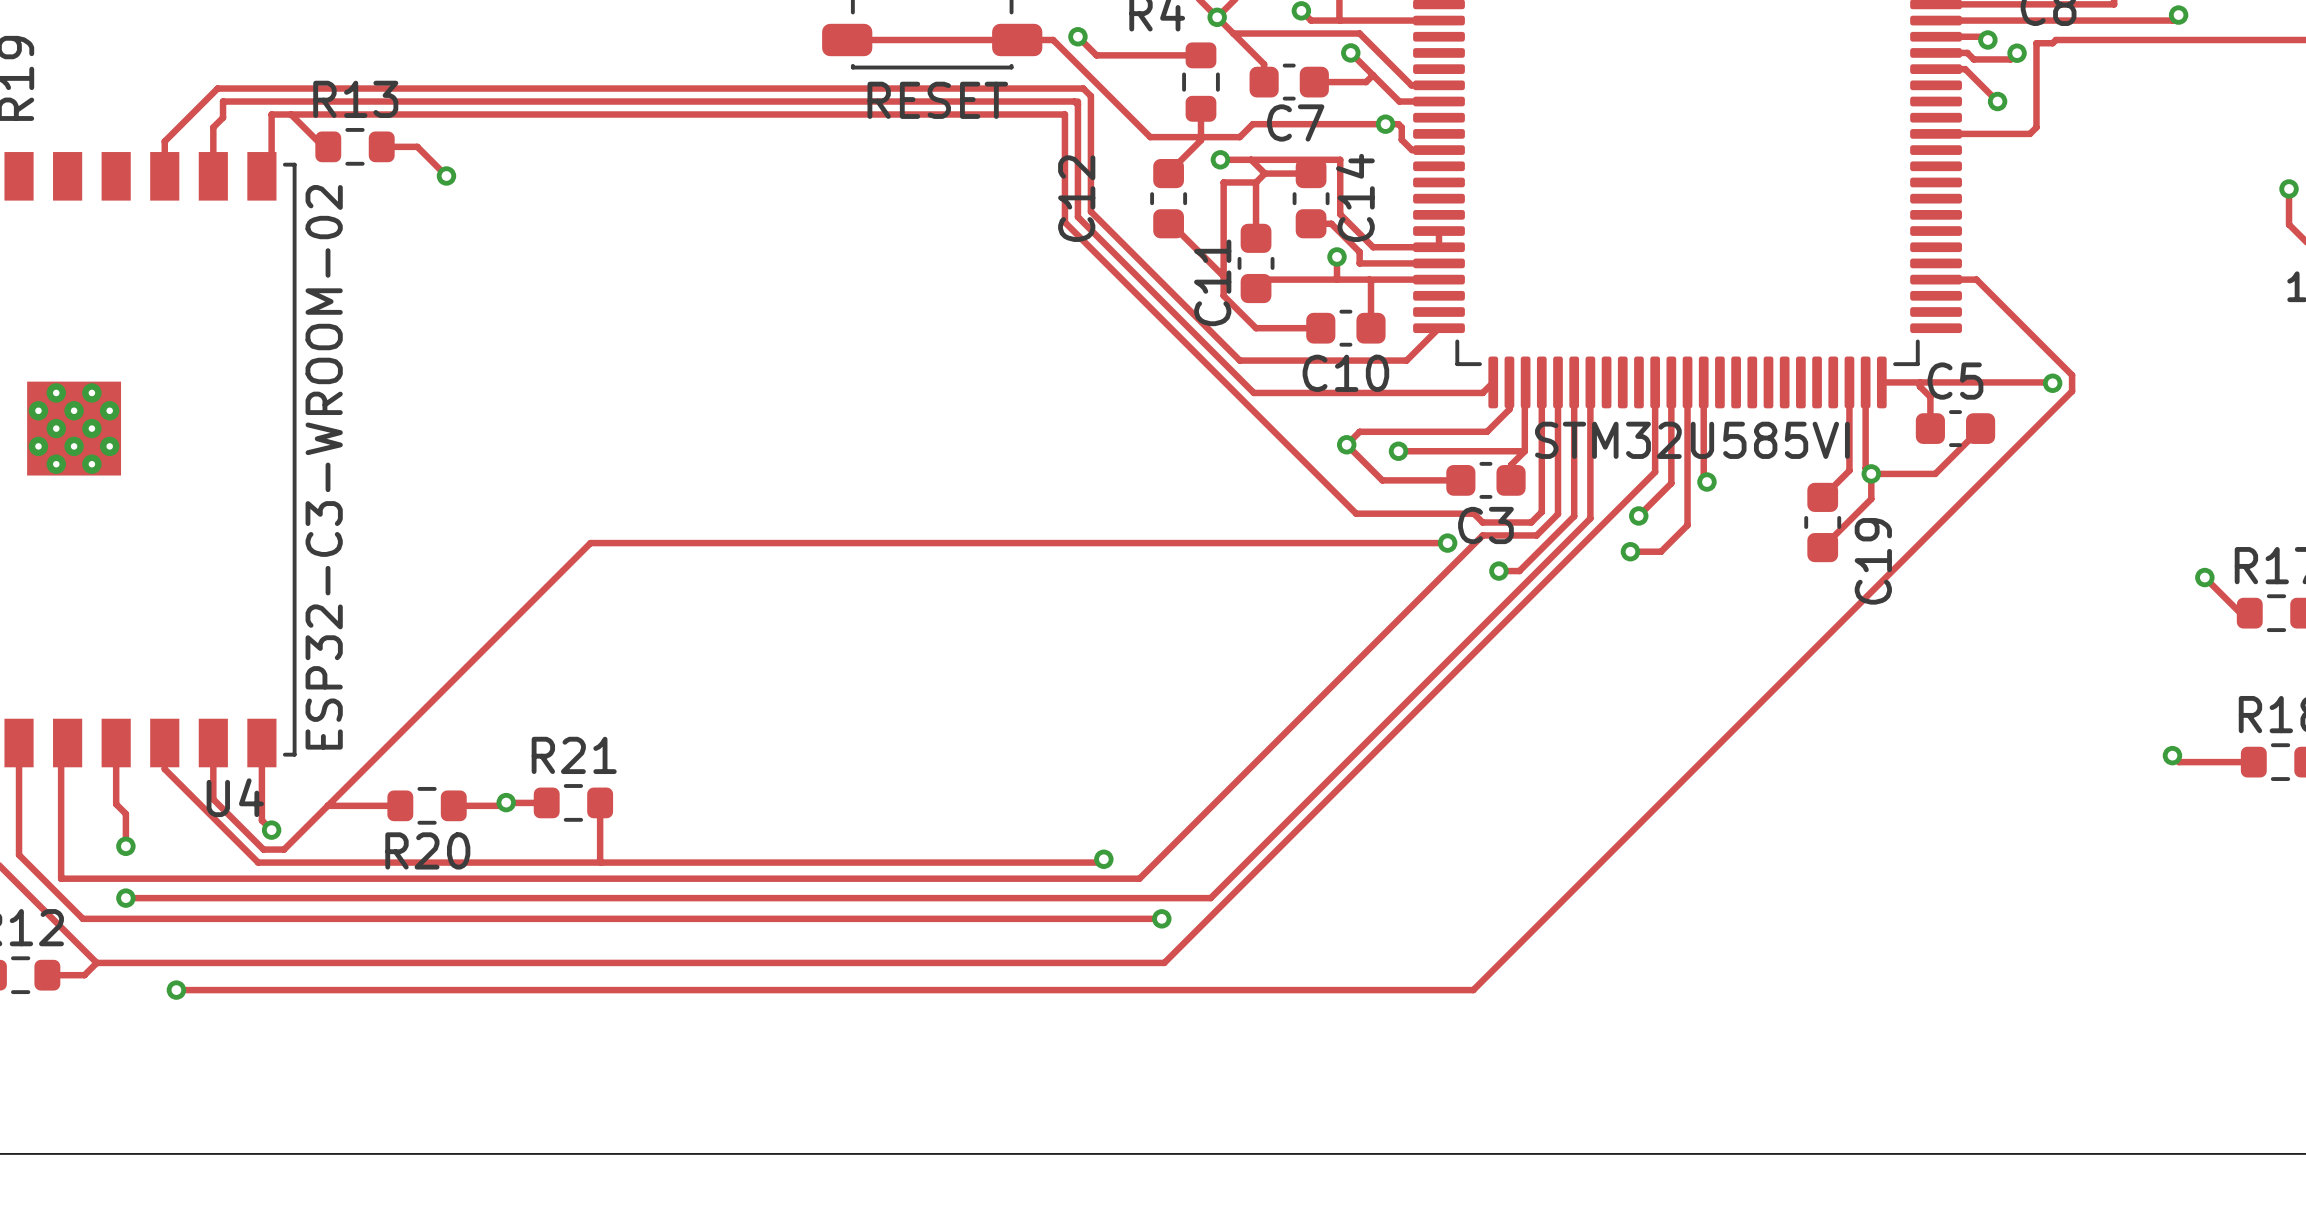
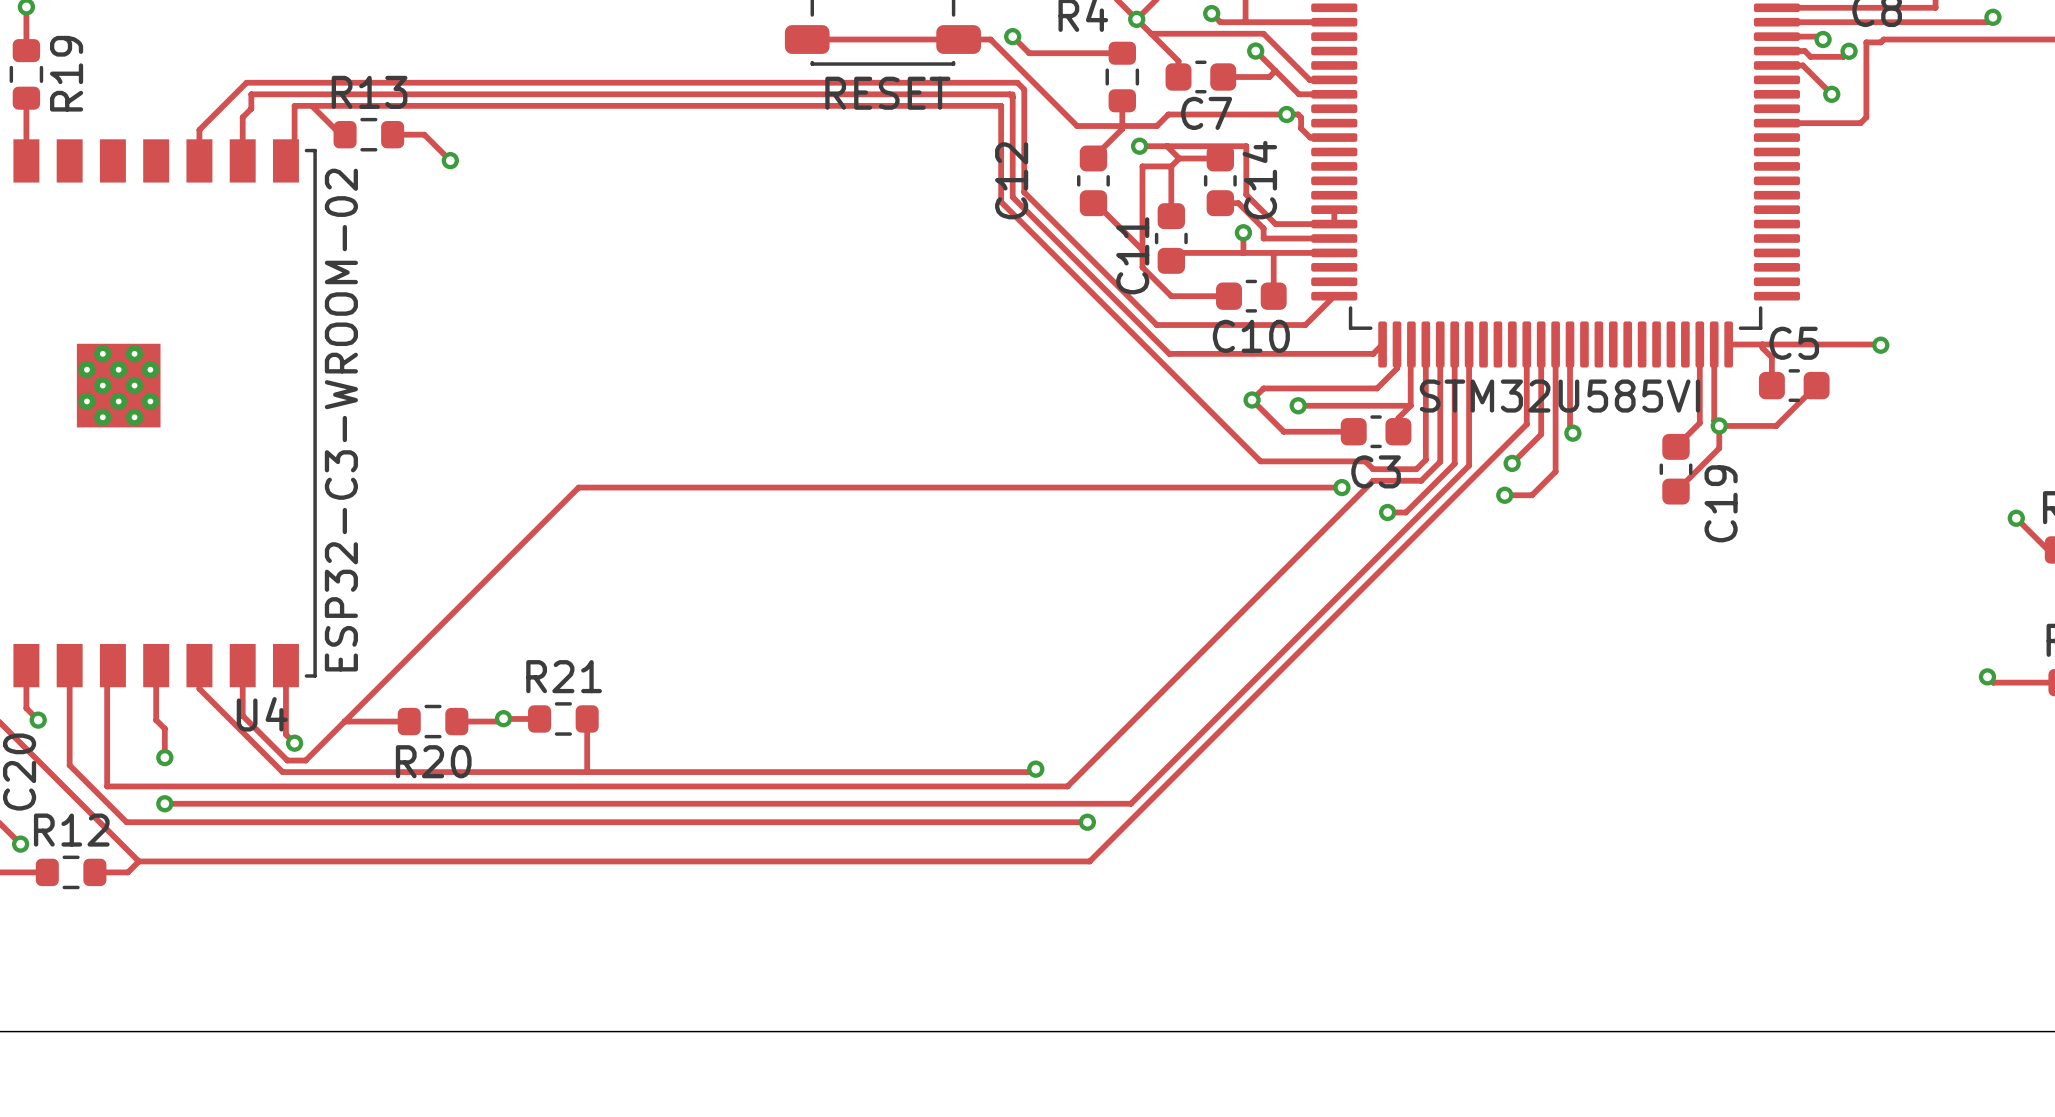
track: (1936, 279) (1976, 279) (2072, 375) (2072, 391) (1473, 990) (176, 990) -> none
via: (176, 990) -> none

